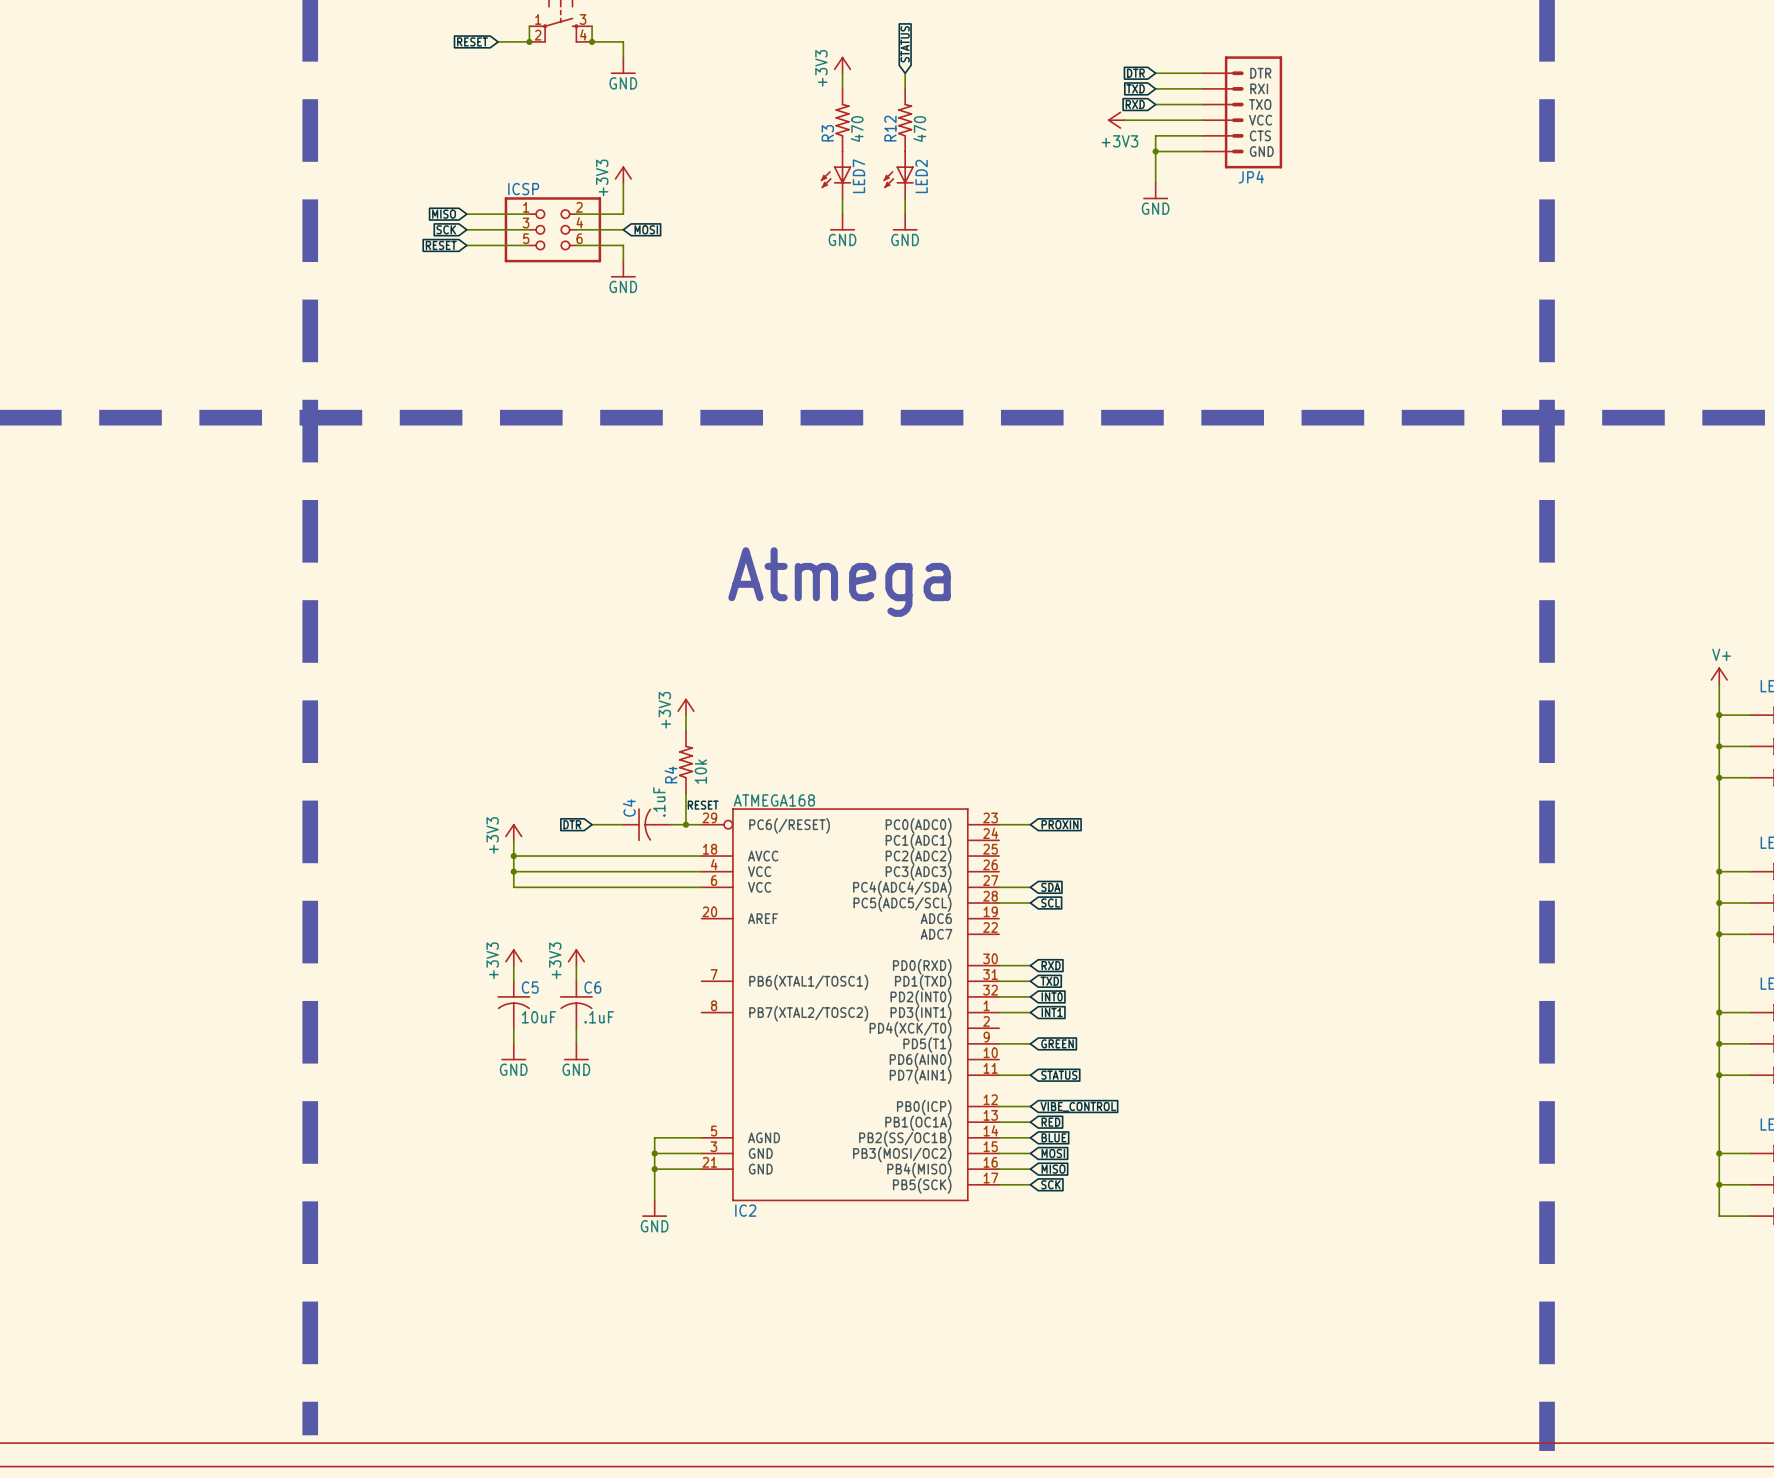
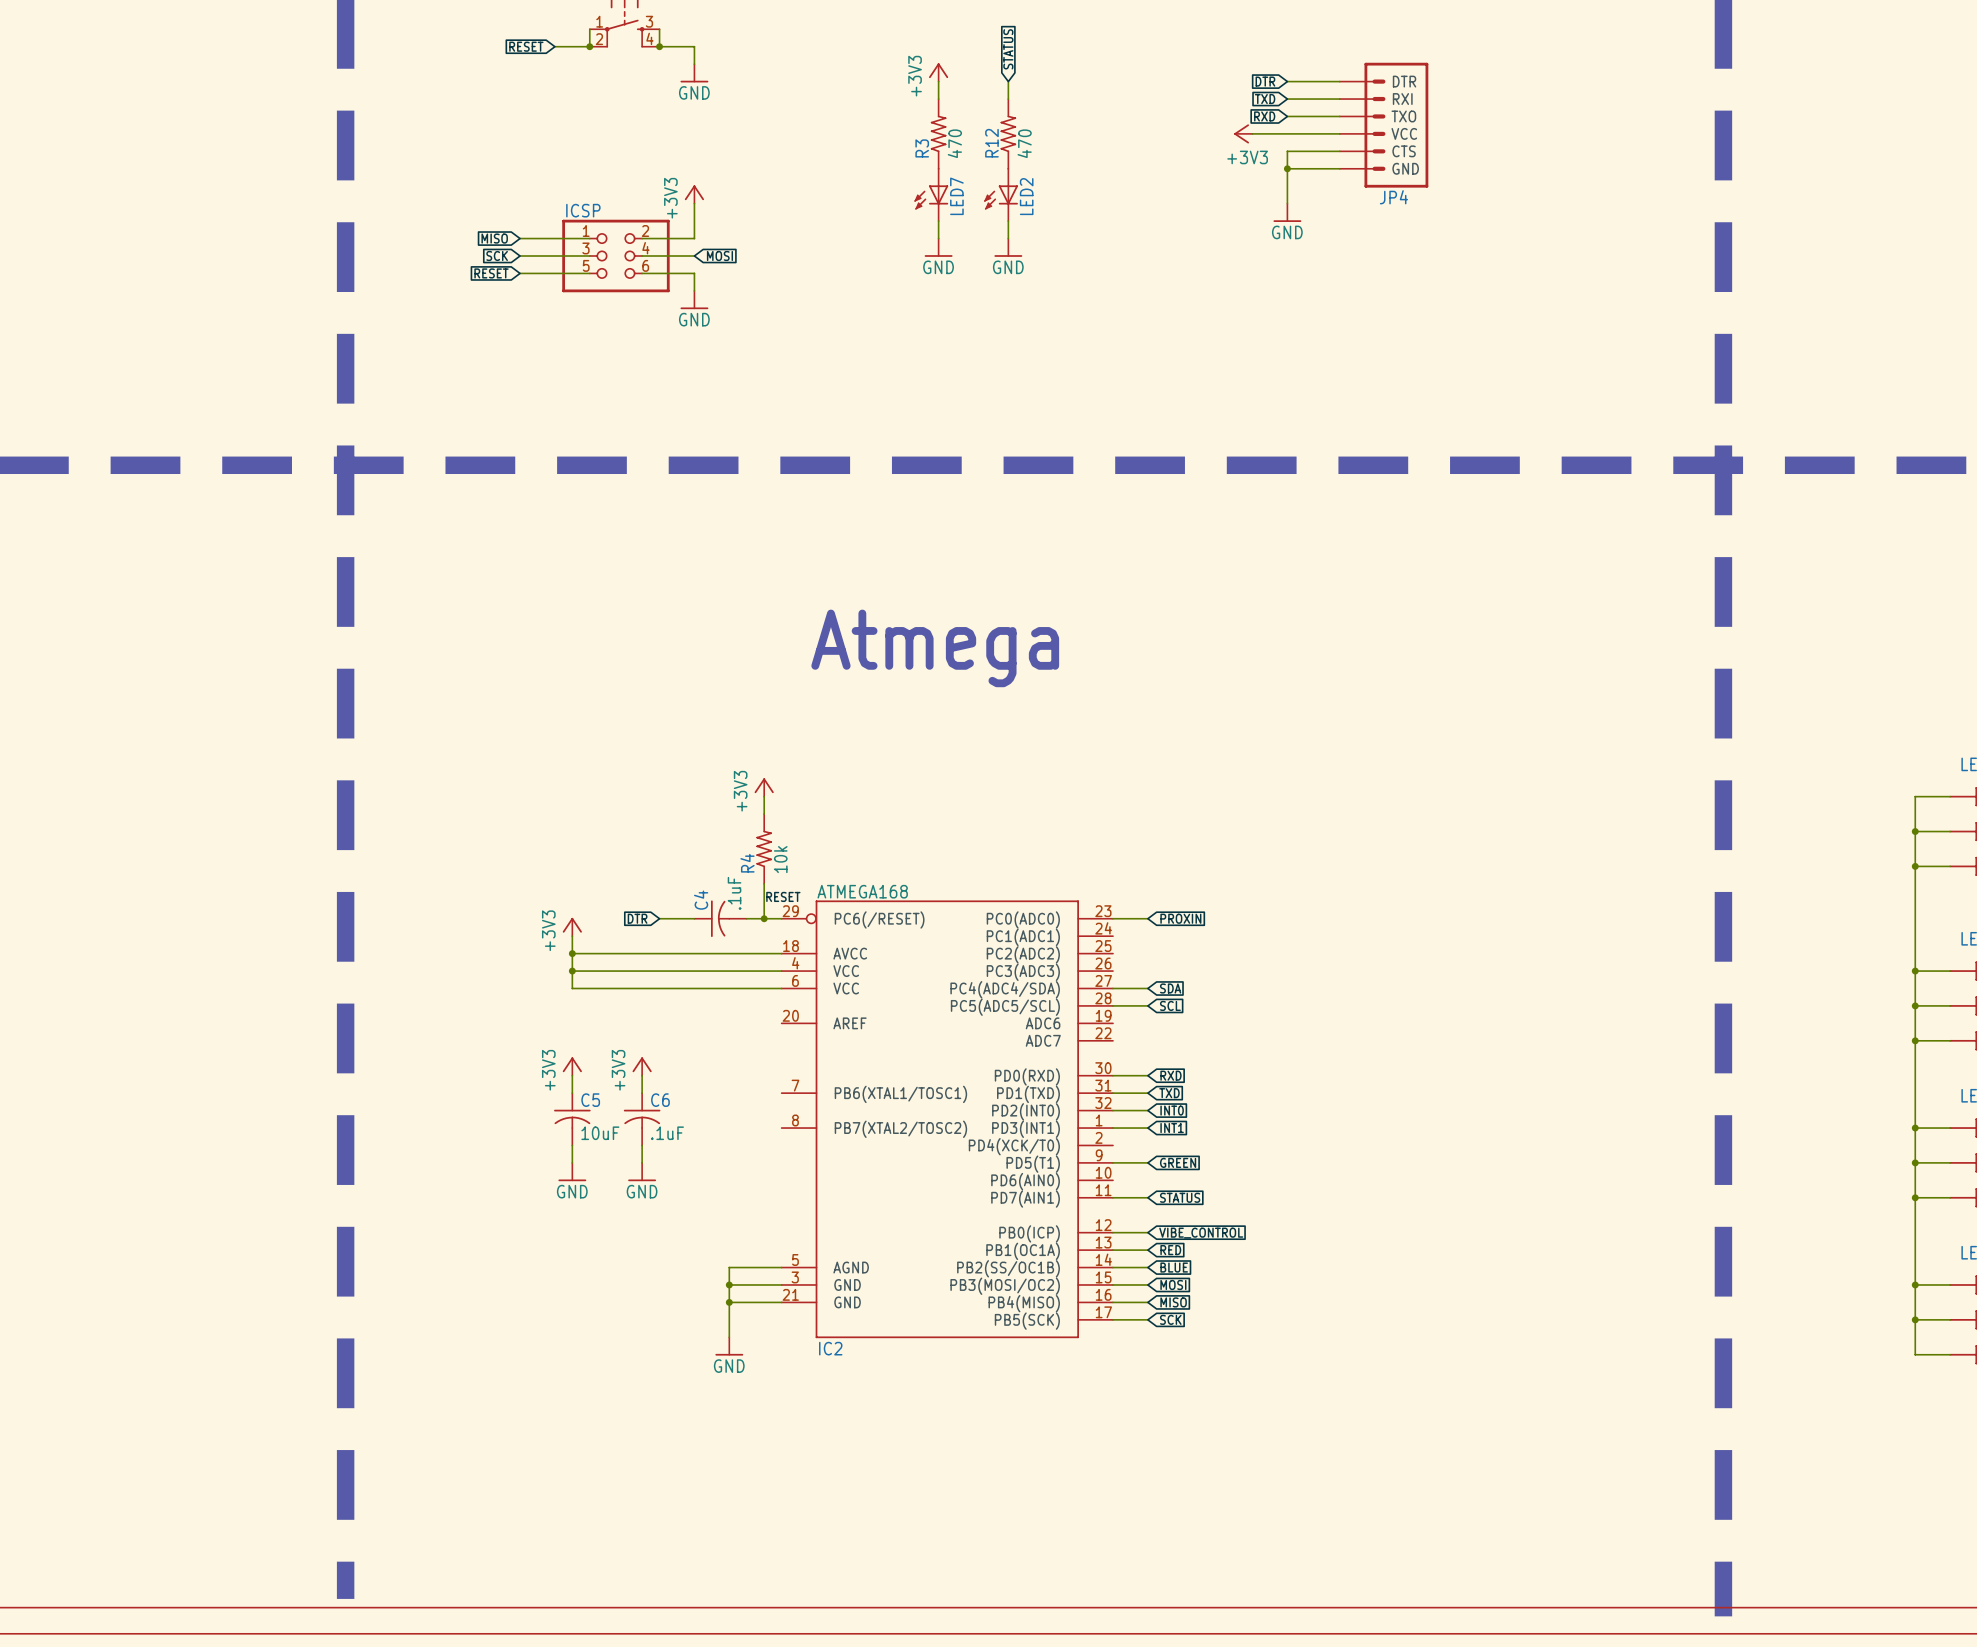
power symbol: V+ (1719, 675) -> none
wire: (1719, 683) (1719, 715) -> none
junction: (1719, 715) -> none

